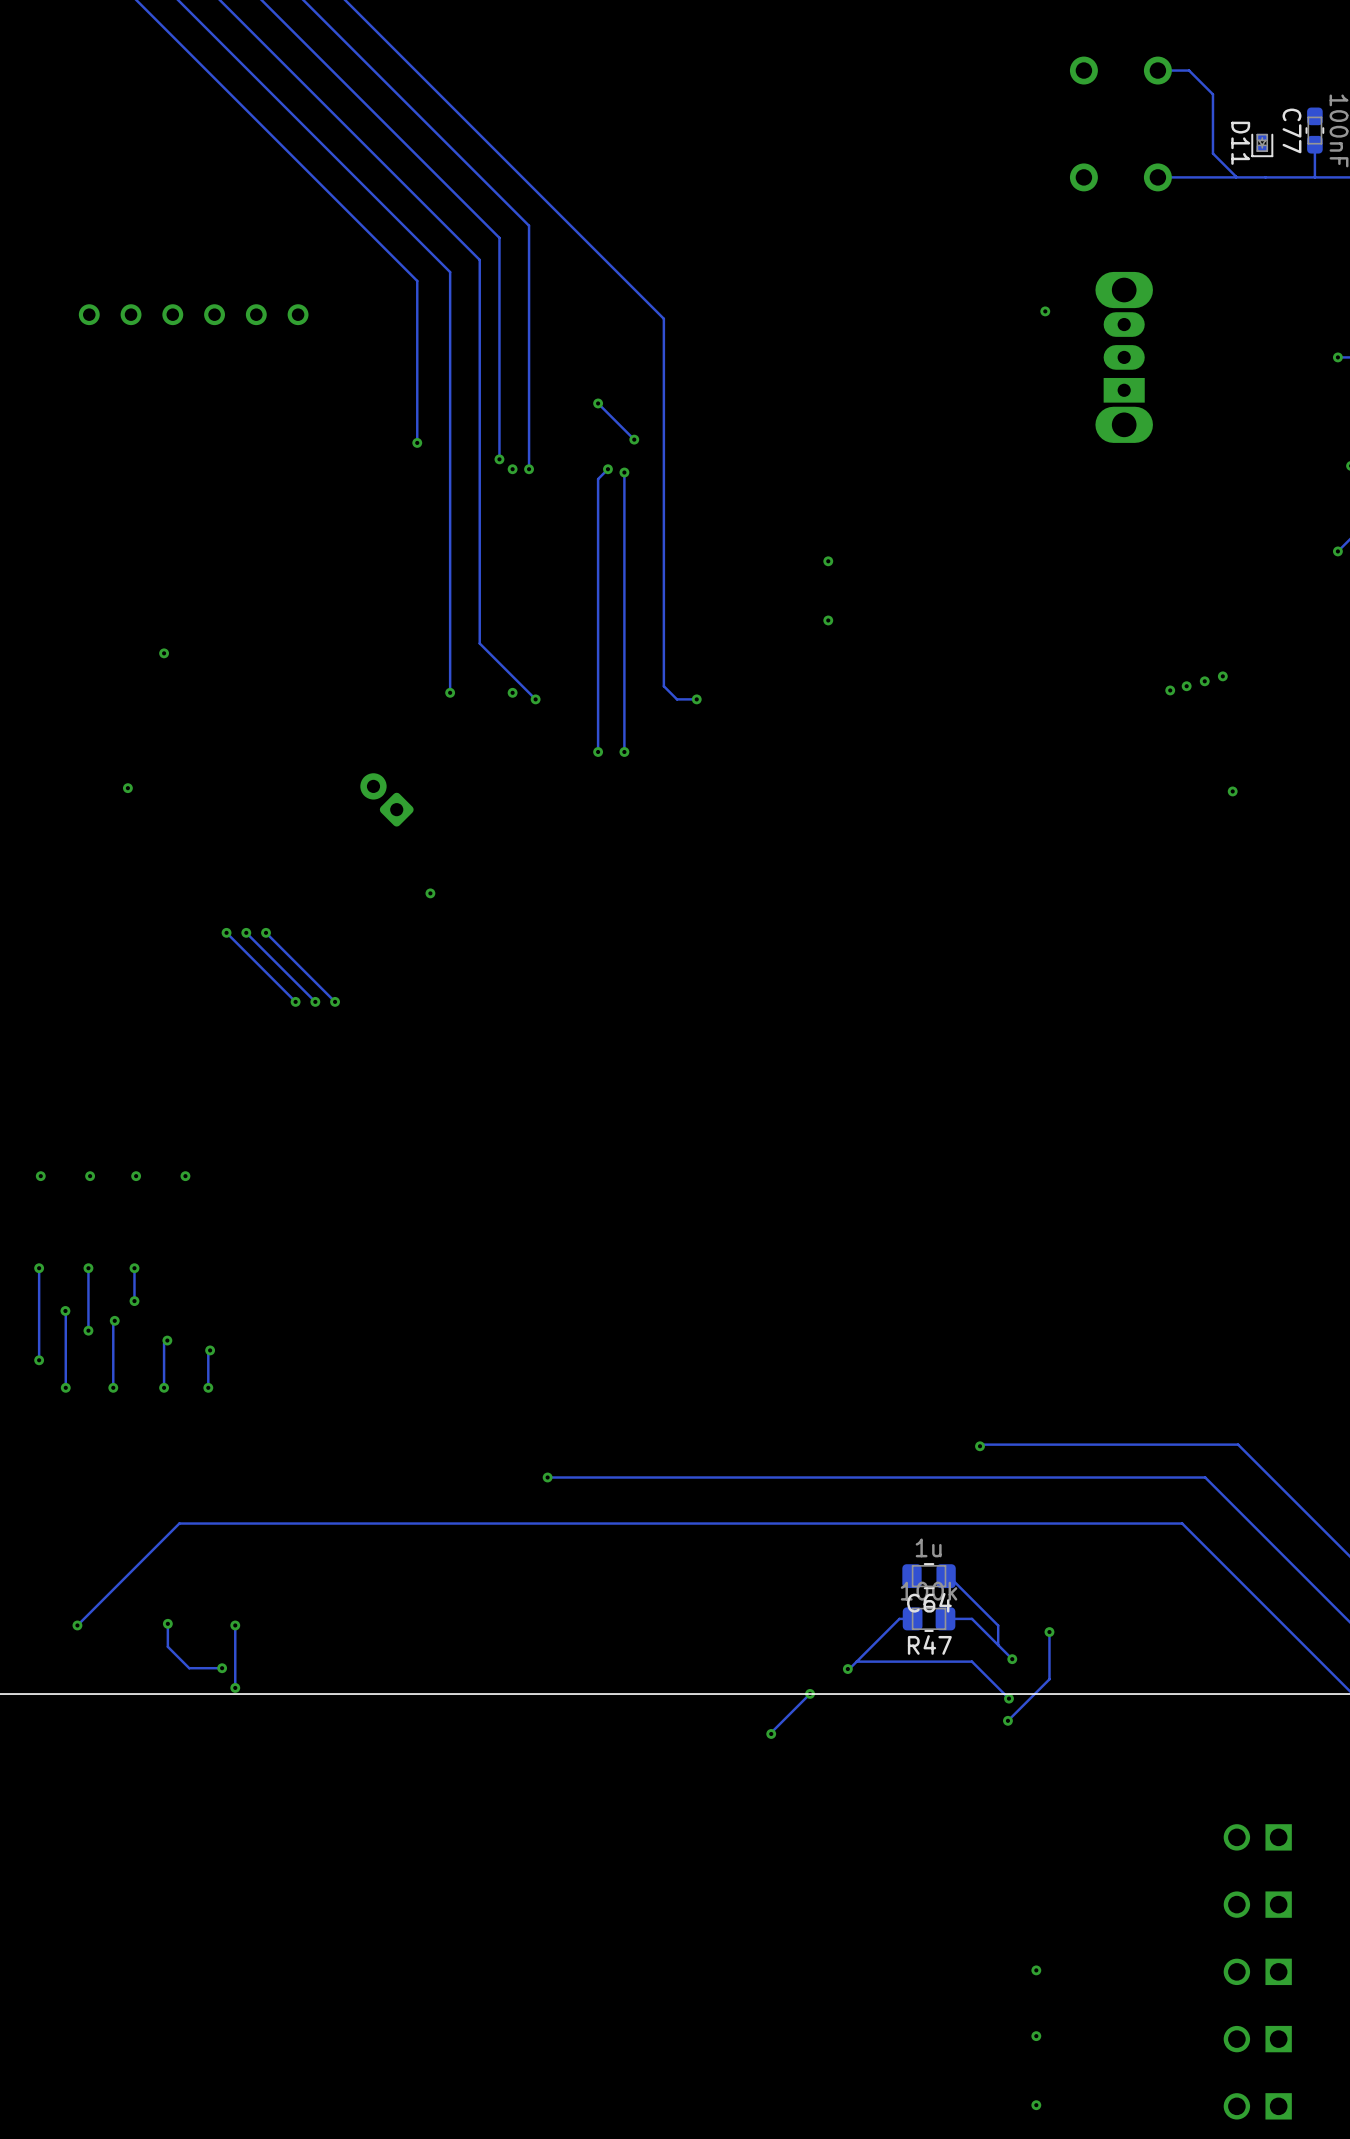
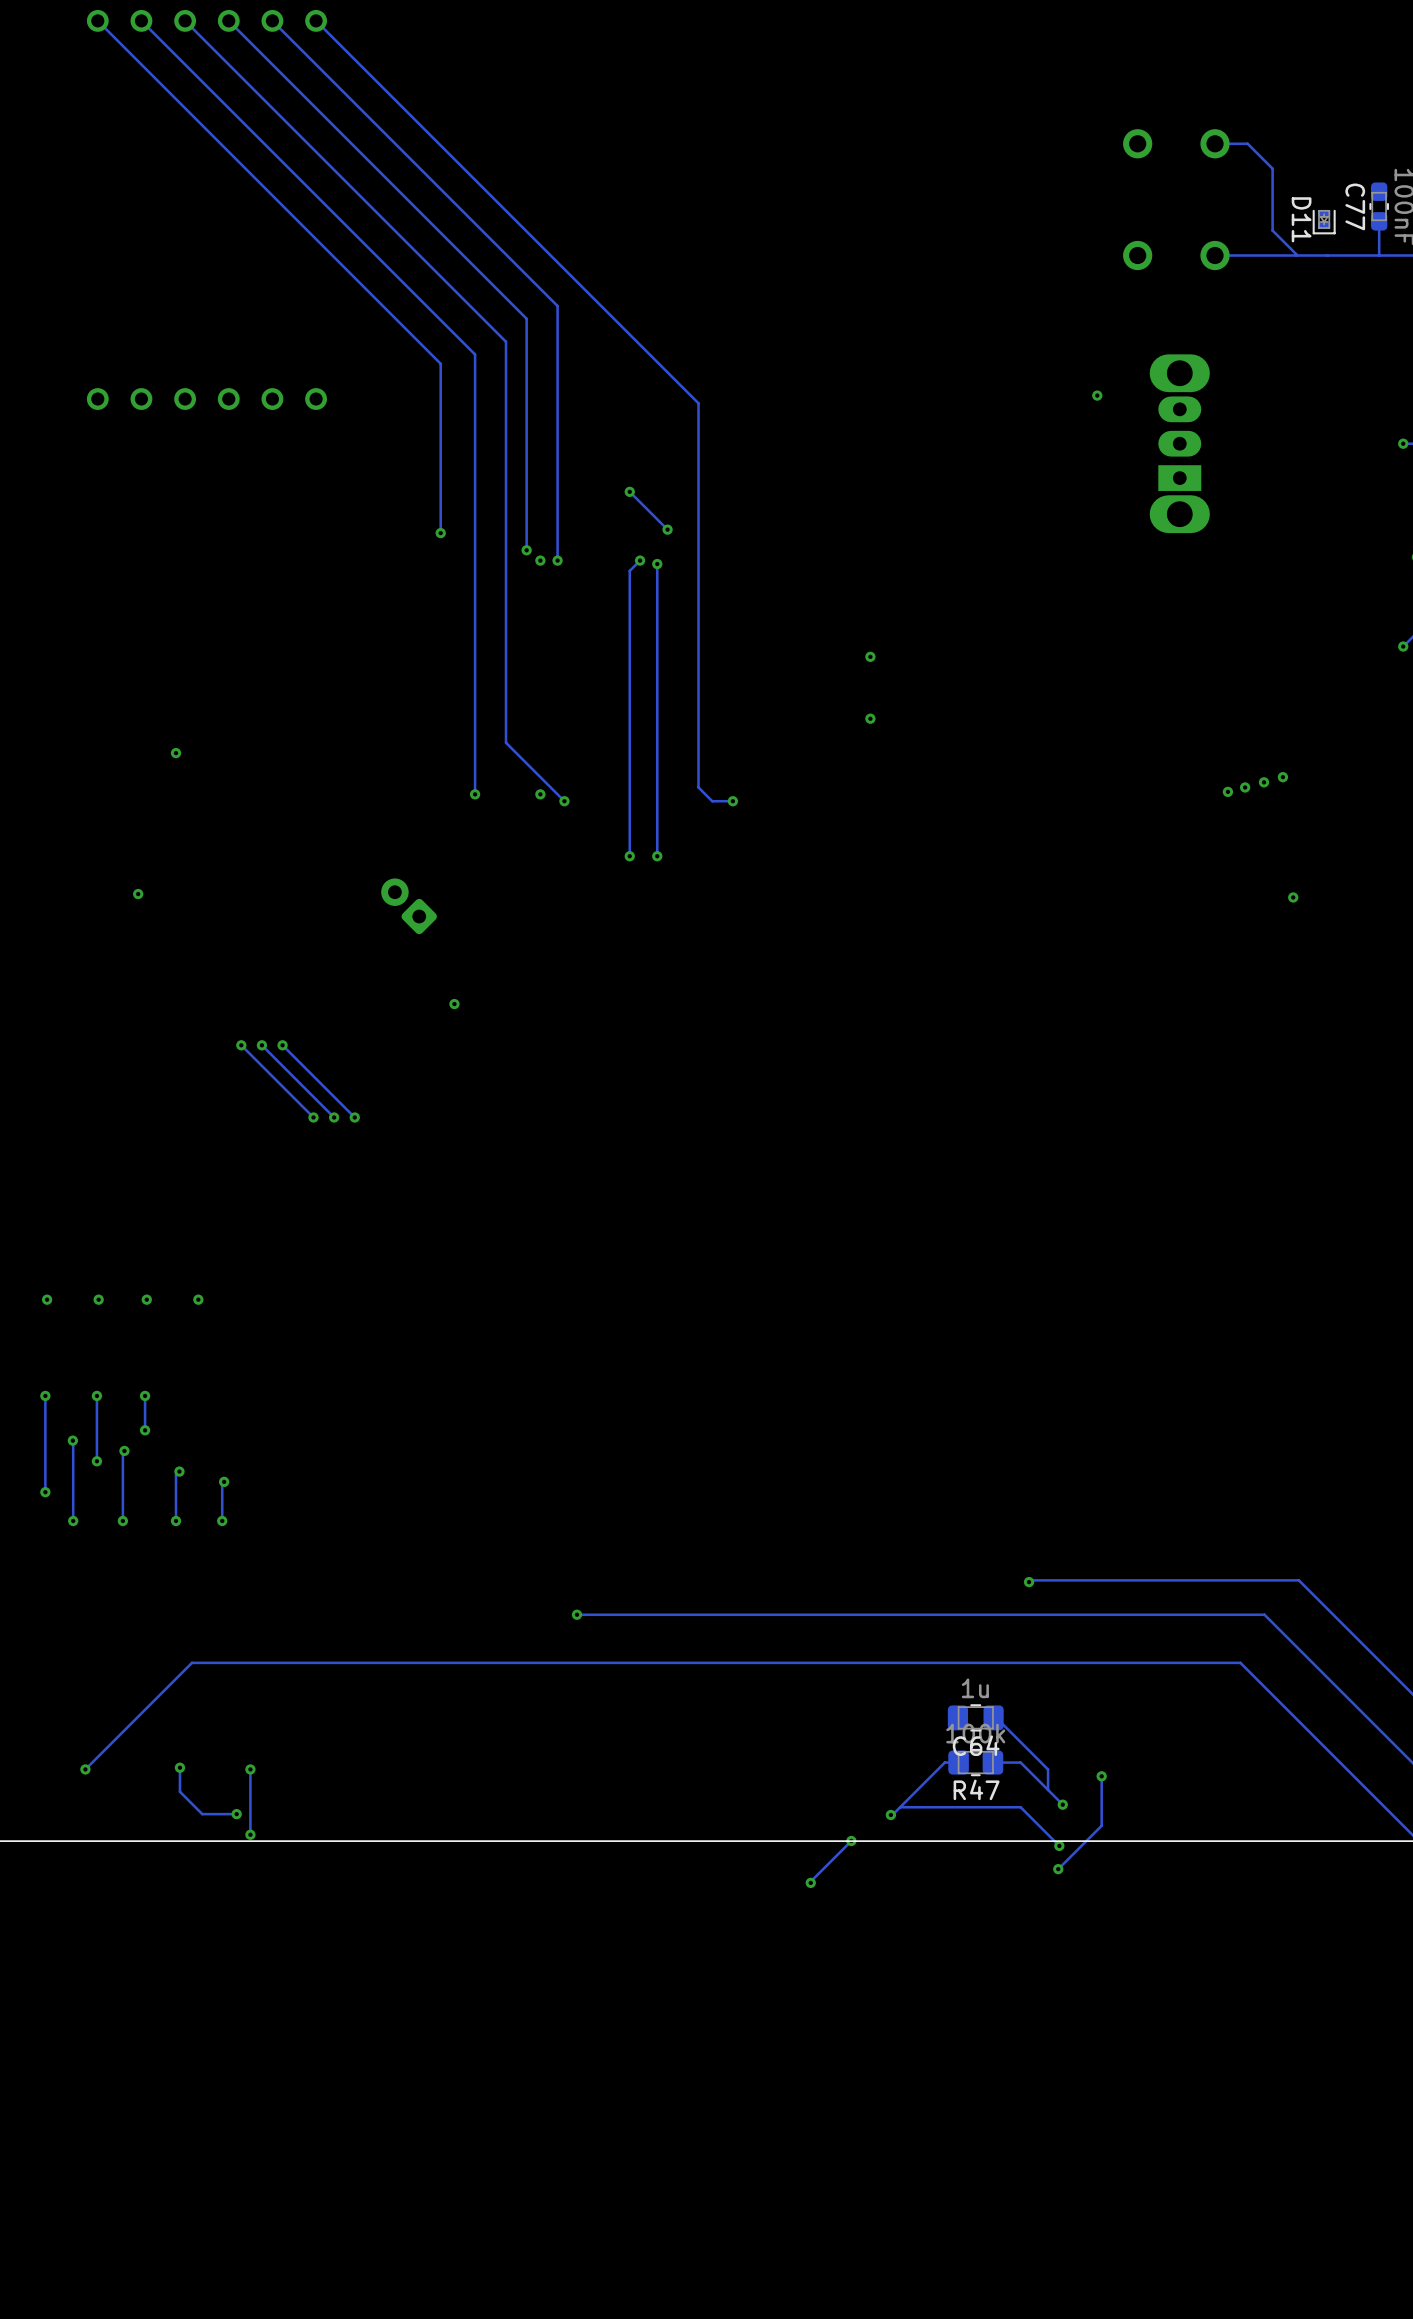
part: (1257, 1837) -> none
part: (1257, 1904) -> none
via: (1036, 1970) -> none
part: (1257, 1971) -> none
via: (1036, 2036) -> none
part: (1257, 2039) -> none
via: (1036, 2105) -> none
part: (1257, 2106) -> none

